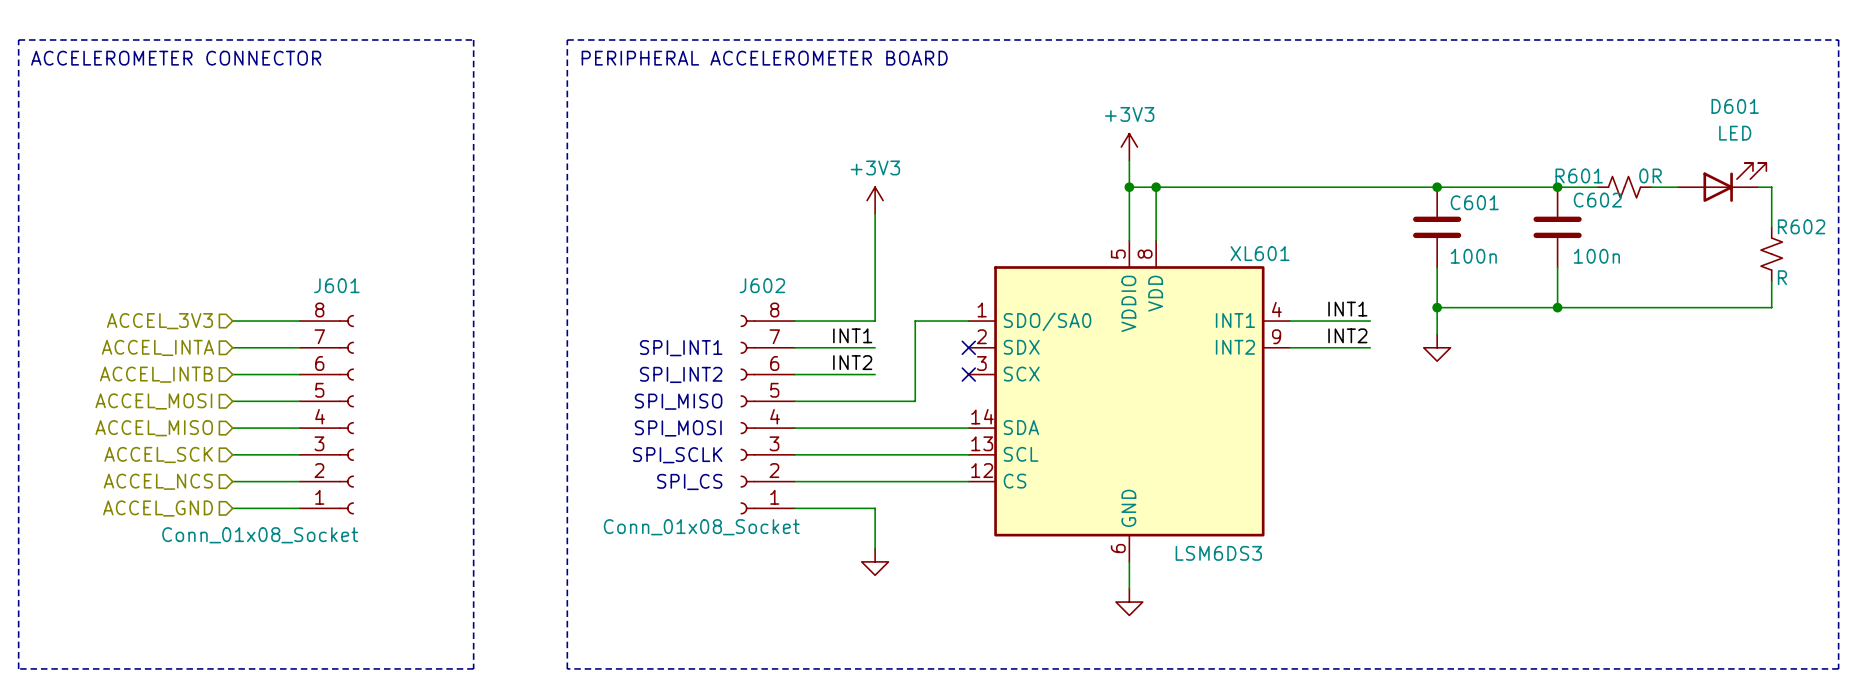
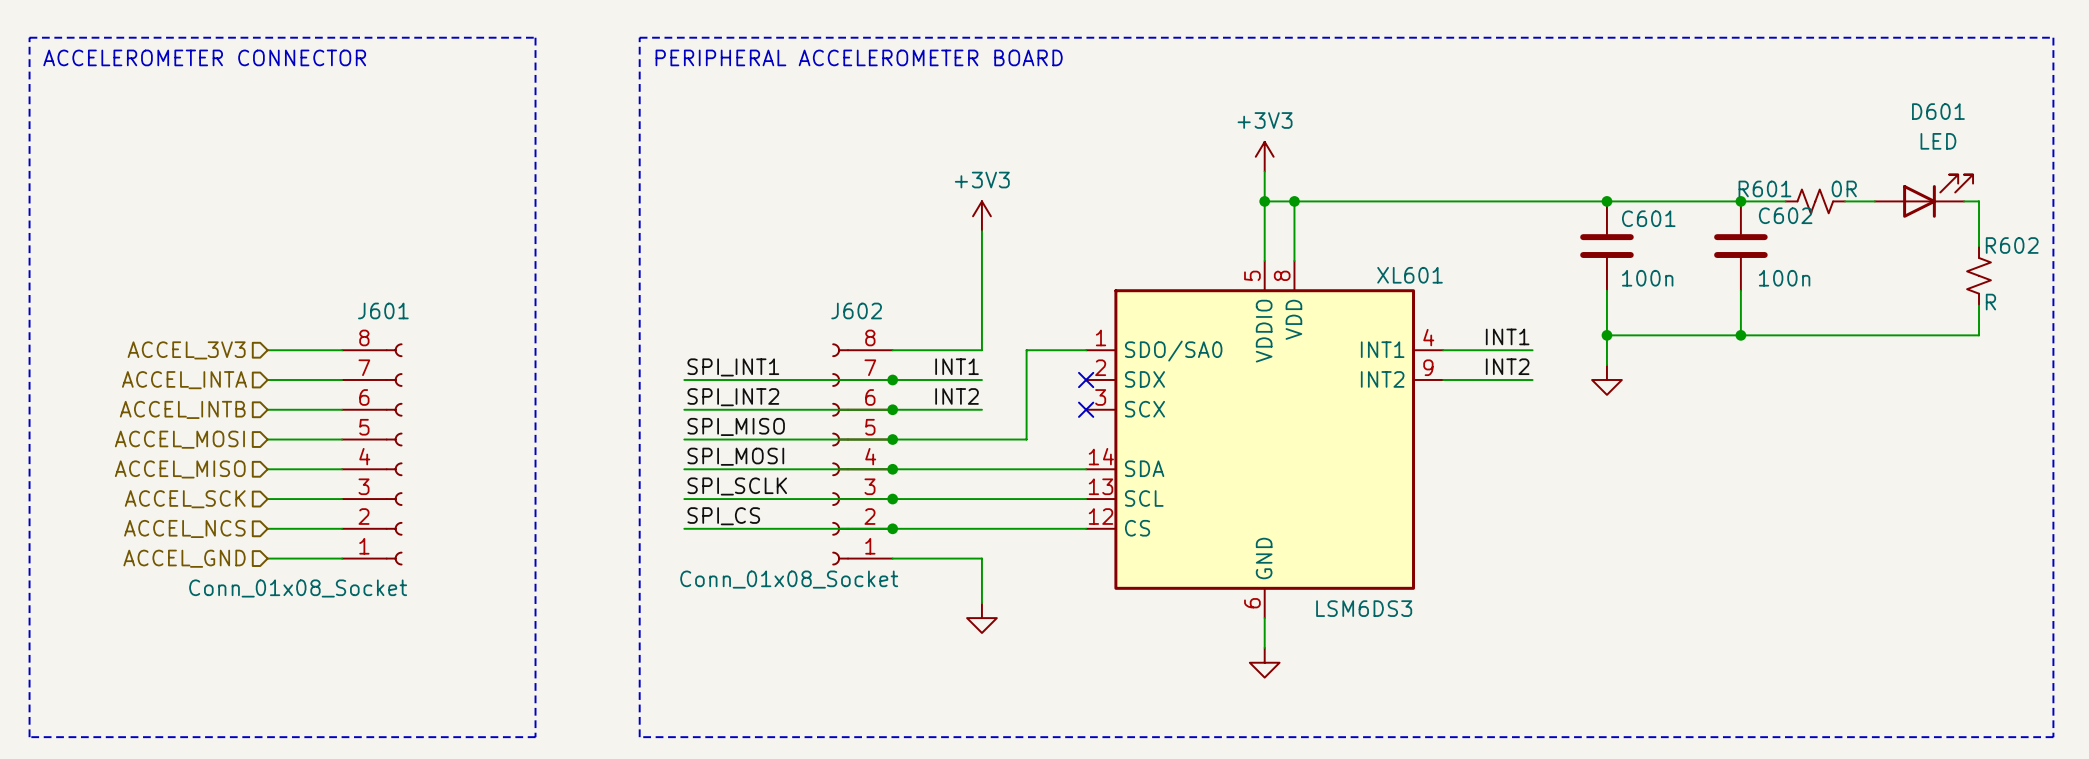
label: none -> SPI_INT1 (733, 367)
wire: none -> (684, 379) (892, 379)
junction: none -> (892, 379)
text: SPI_INT1 (681, 348) -> none
label: none -> SPI_INT2 (733, 397)
wire: none -> (684, 409) (892, 409)
text: SPI_INT2 (681, 374) -> none
junction: none -> (892, 409)
label: none -> SPI_MISO (736, 426)
wire: none -> (684, 439) (892, 439)
text: SPI_MISO (678, 401) -> none
junction: none -> (892, 439)
label: none -> SPI_MOSI (735, 456)
wire: none -> (684, 469) (892, 469)
text: SPI_MOSI (678, 428) -> none
junction: none -> (892, 469)
label: none -> SPI_SCLK (737, 486)
wire: none -> (684, 499) (892, 499)
junction: none -> (892, 499)
text: SPI_SCLK (677, 455) -> none
label: none -> SPI_CS (723, 516)
wire: none -> (684, 528) (892, 528)
text: SPI_CS (689, 481) -> none
junction: none -> (892, 528)

